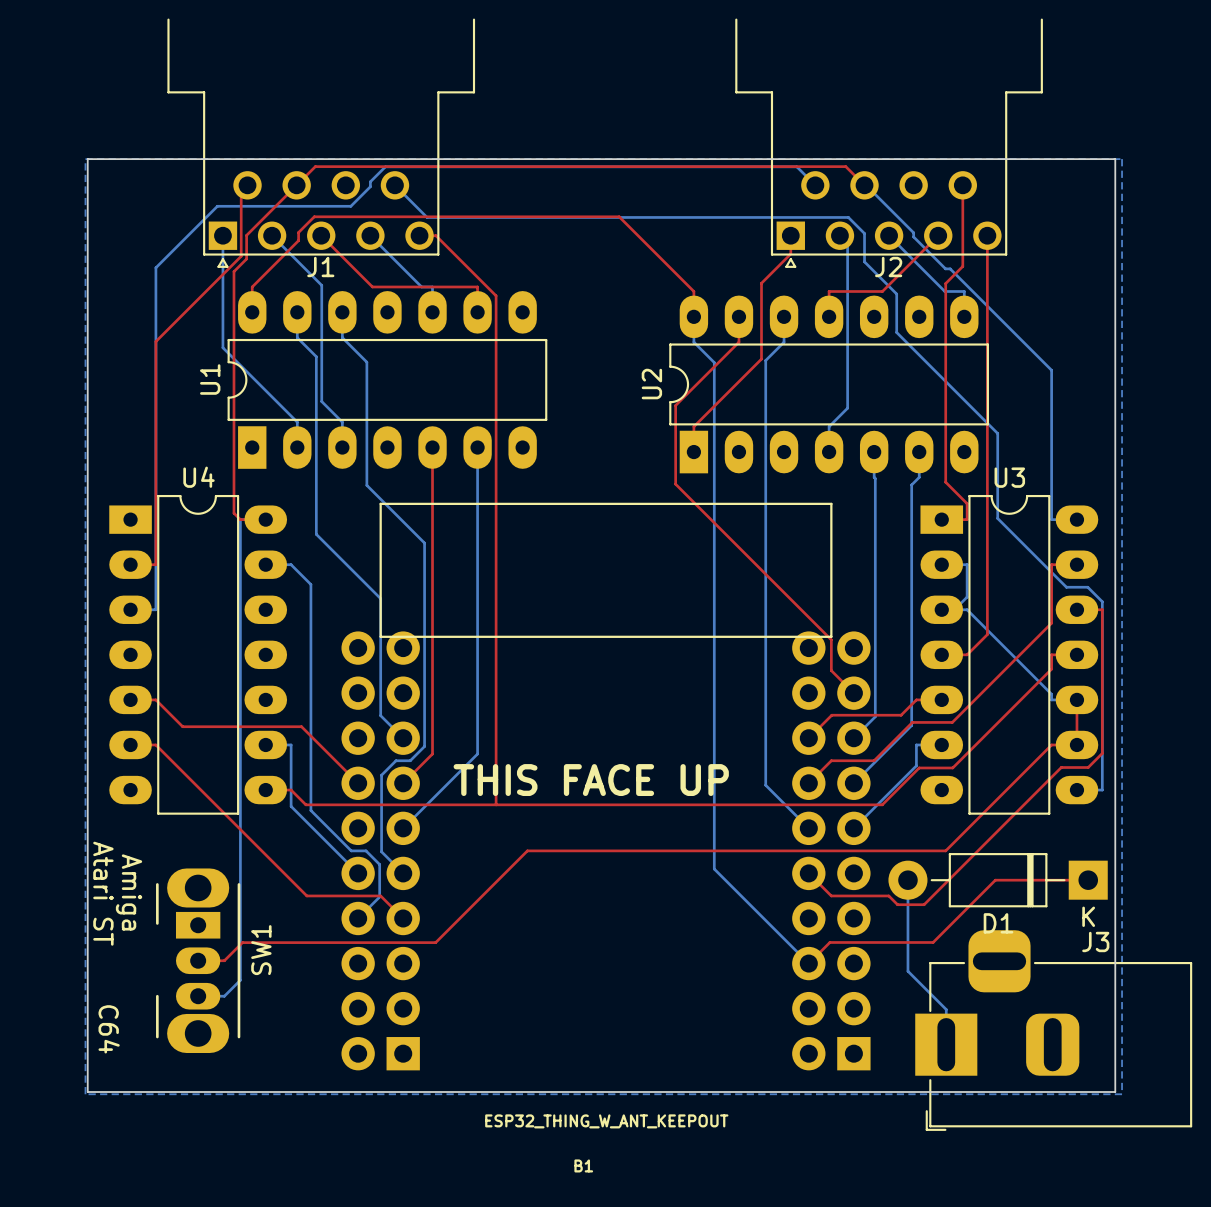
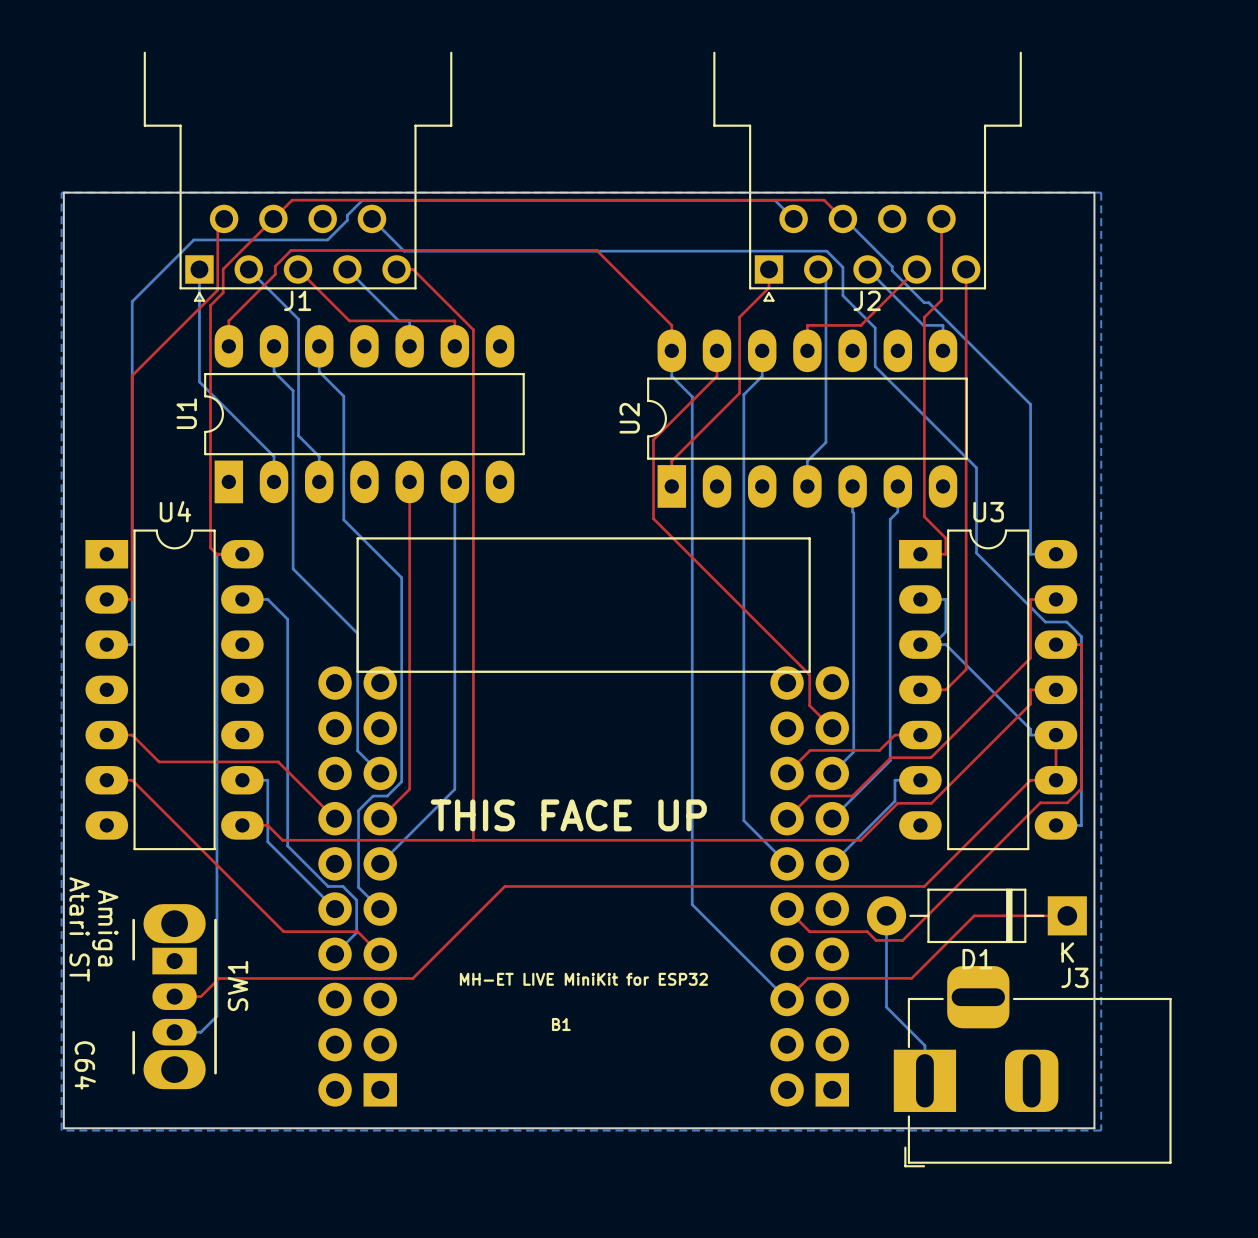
B1 value: ESP32_THING_W_ANT_KEEPOUT (606, 1121) -> MH-ET LIVE MiniKit for ESP32 (583, 979)
B1 name position: B1 (583, 1165) -> B1 (561, 1024)

